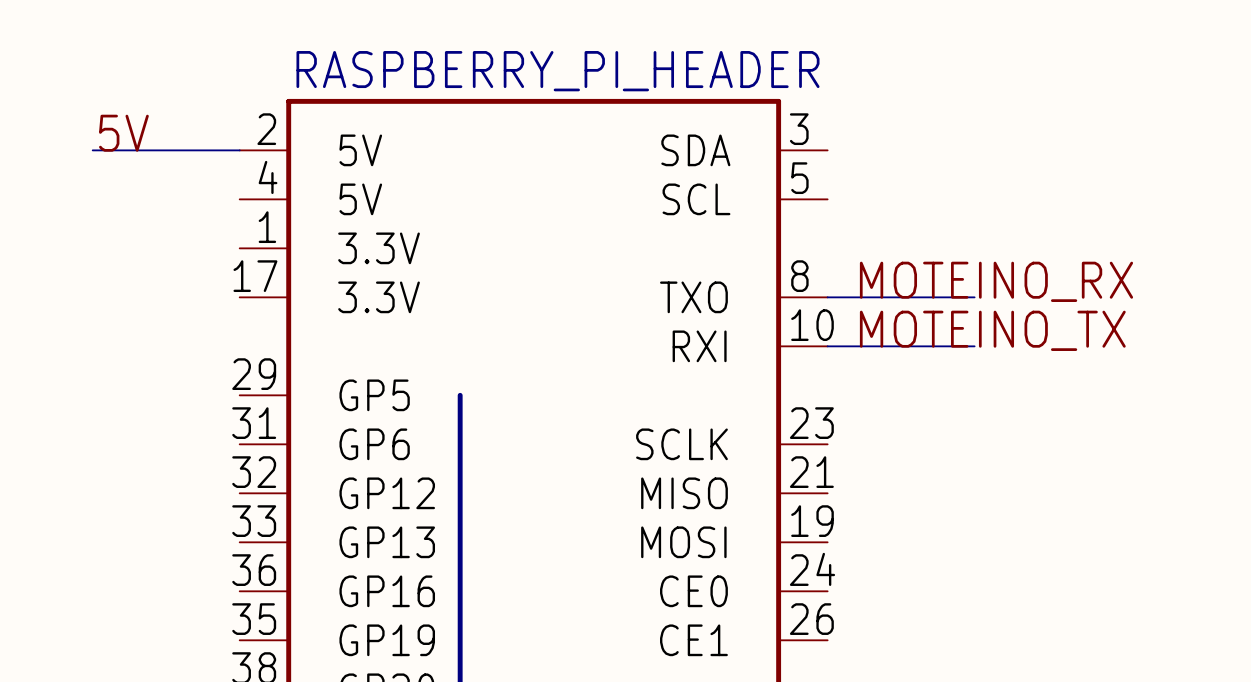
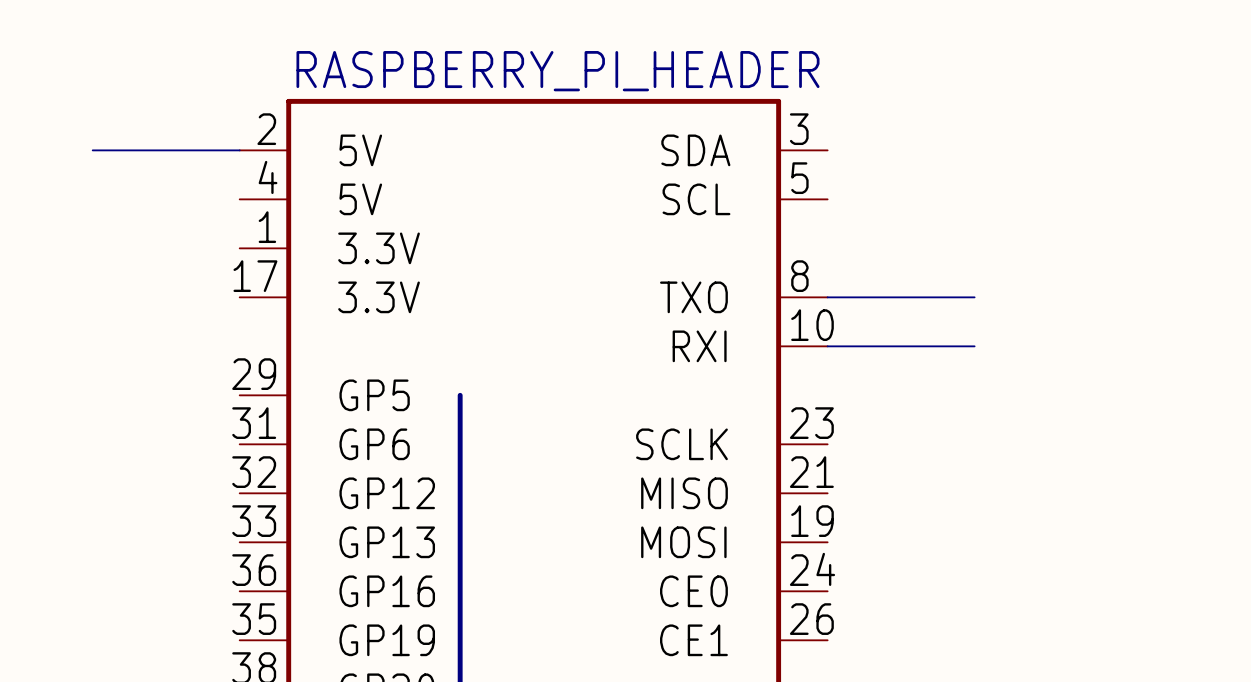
label: 5V (123, 133) -> none
label: MOTEINO_RX (996, 281) -> none
label: MOTEINO_TX (992, 330) -> none

